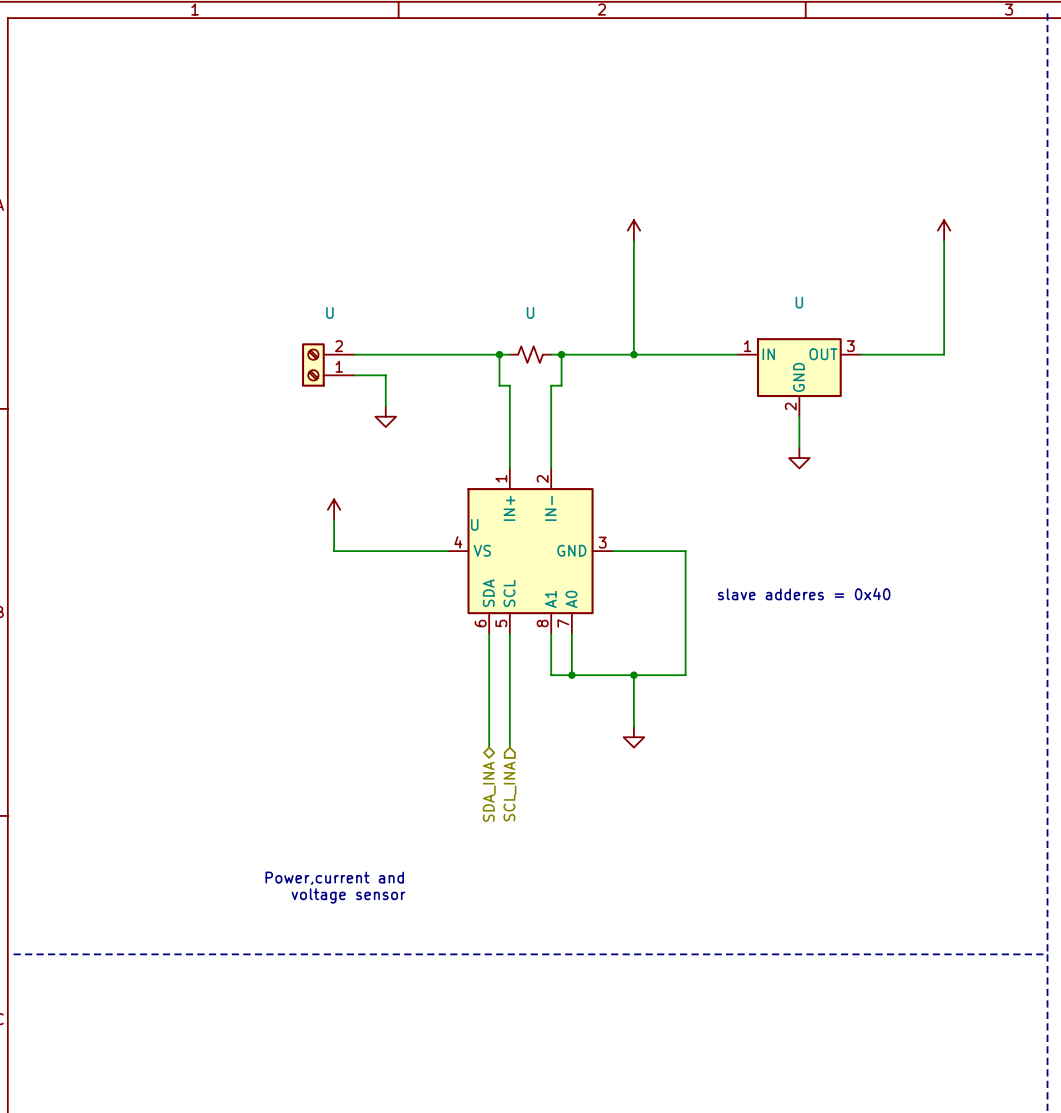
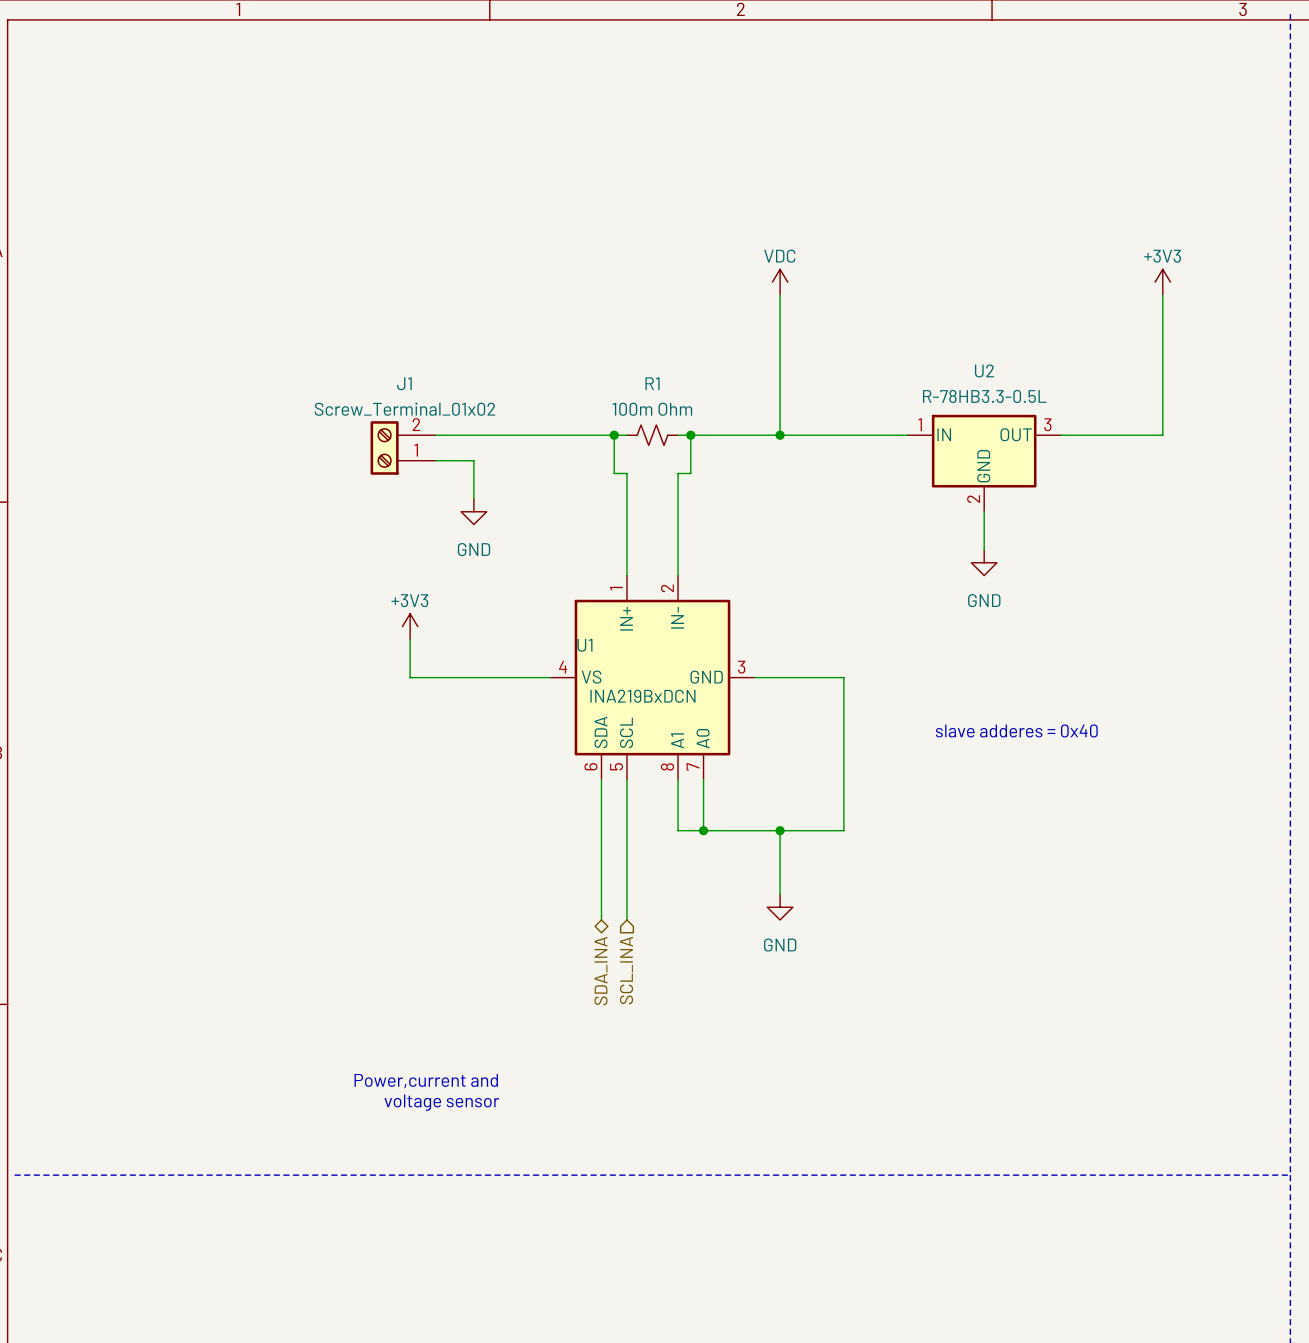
power symbol text: none -> VDC (779, 256)
power symbol text: none -> +3V3 (1162, 256)
U name: U (799, 302) -> U2 (984, 370)
U name: U (329, 312) -> J1 (404, 383)
U name: U (530, 312) -> R1 (652, 383)
U value: none -> R-78HB3.3-0.5L (984, 396)
U value: none -> 100m Ohm (652, 409)
U value: none -> Screw_Terminal_01x02 (404, 409)
power symbol text: none -> GND (473, 549)
power symbol text: none -> +3V3 (409, 600)
power symbol text: none -> GND (984, 600)
U name: U (474, 524) -> U1 (584, 645)
U value: none -> INA219BxDCN (642, 696)
power symbol text: none -> GND (780, 945)

